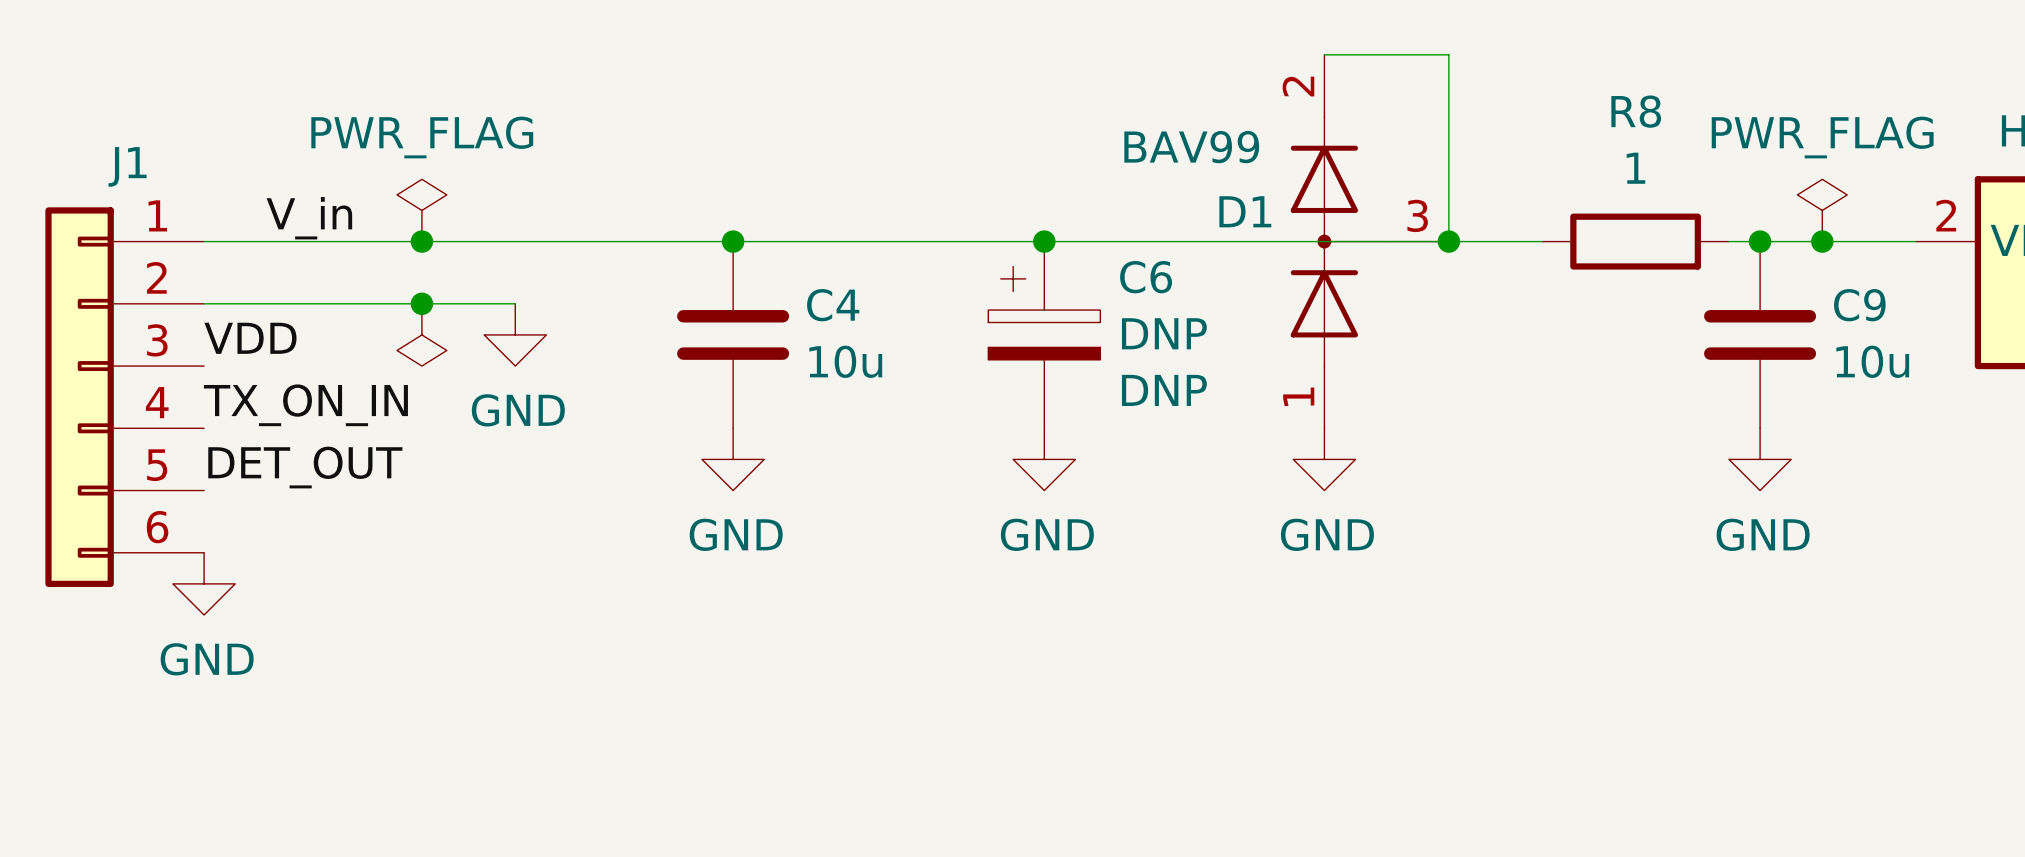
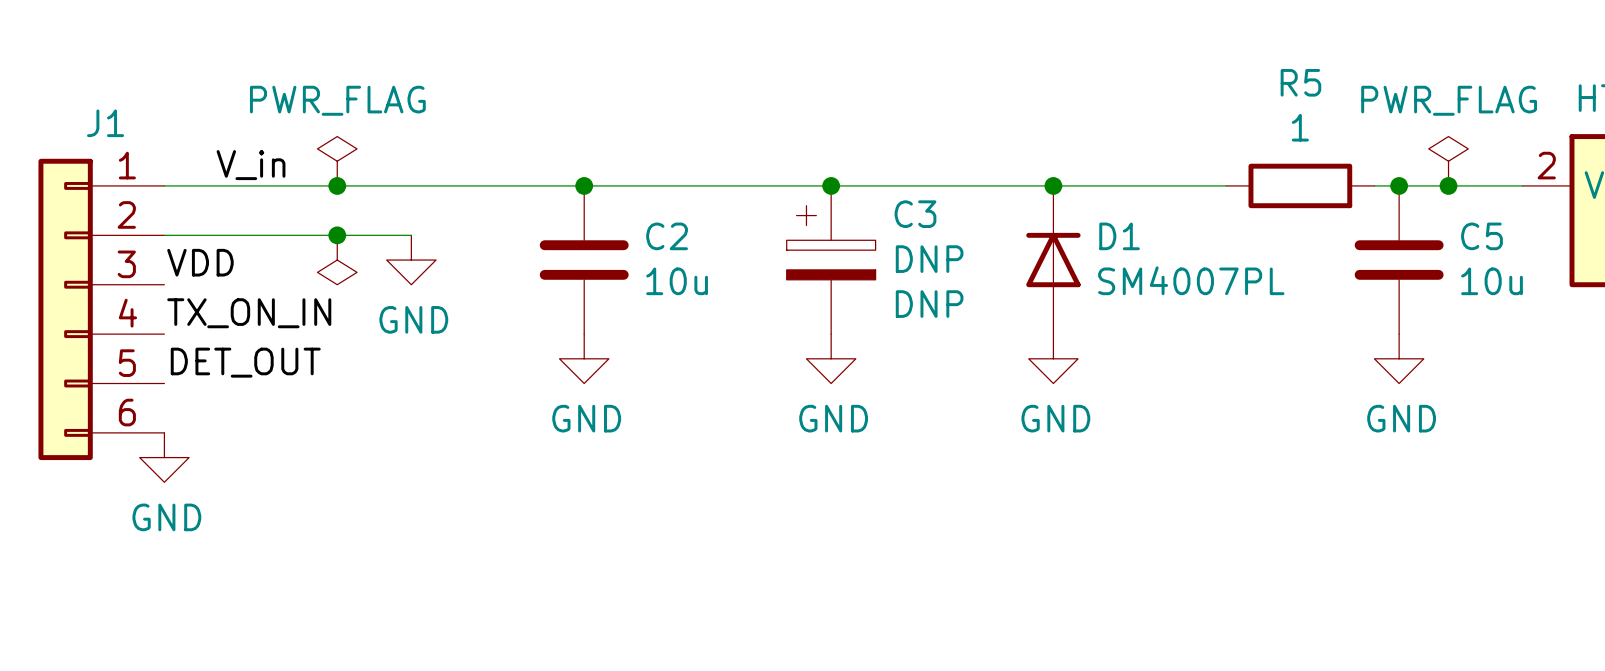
D1 symbol: [1290, 54, 1449, 429] -> [1026, 185, 1081, 335]
wire: (1324, 54) (1448, 54) (1448, 241) -> none
R8 name: R8 (1636, 111) -> R5 (1300, 82)
D1 value: BAV99 (1191, 147) -> SM4007PL (1191, 280)
D1 name position: D1 (1245, 211) -> D1 (1119, 236)
junction position: (1448, 241) -> (1053, 185)
C6 name: C6 (1146, 277) -> C3 (915, 214)
C4 name: C4 (833, 305) -> C2 (667, 236)
C9 name: C9 (1859, 305) -> C5 (1481, 236)

